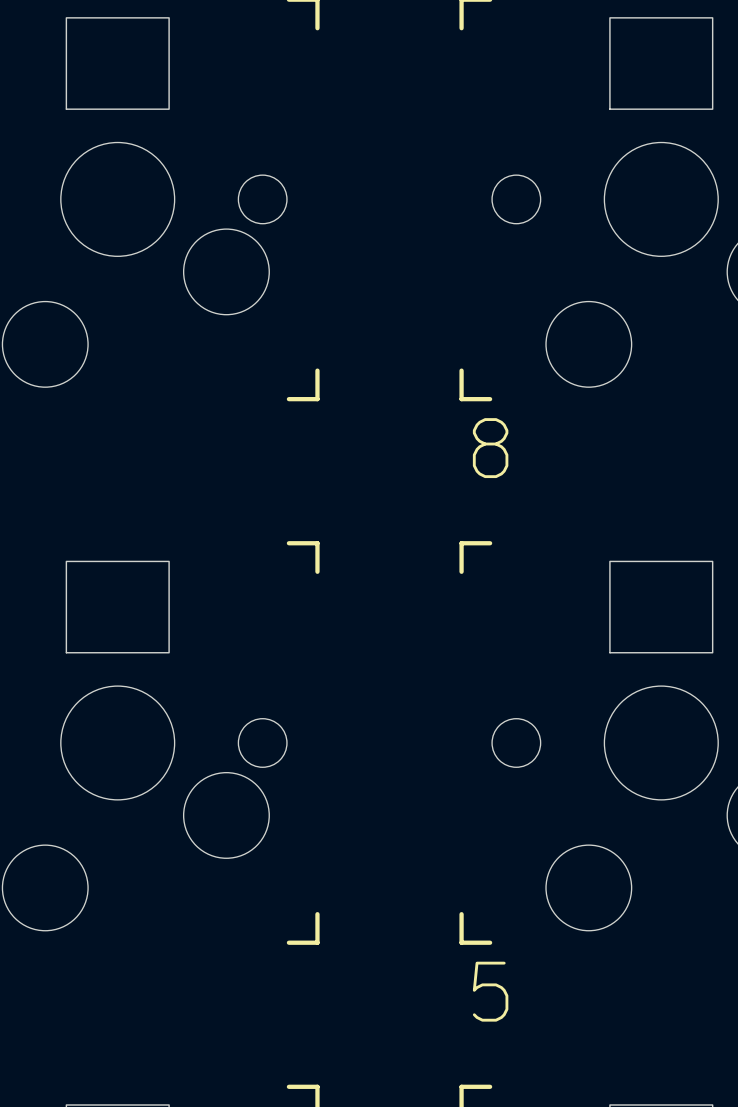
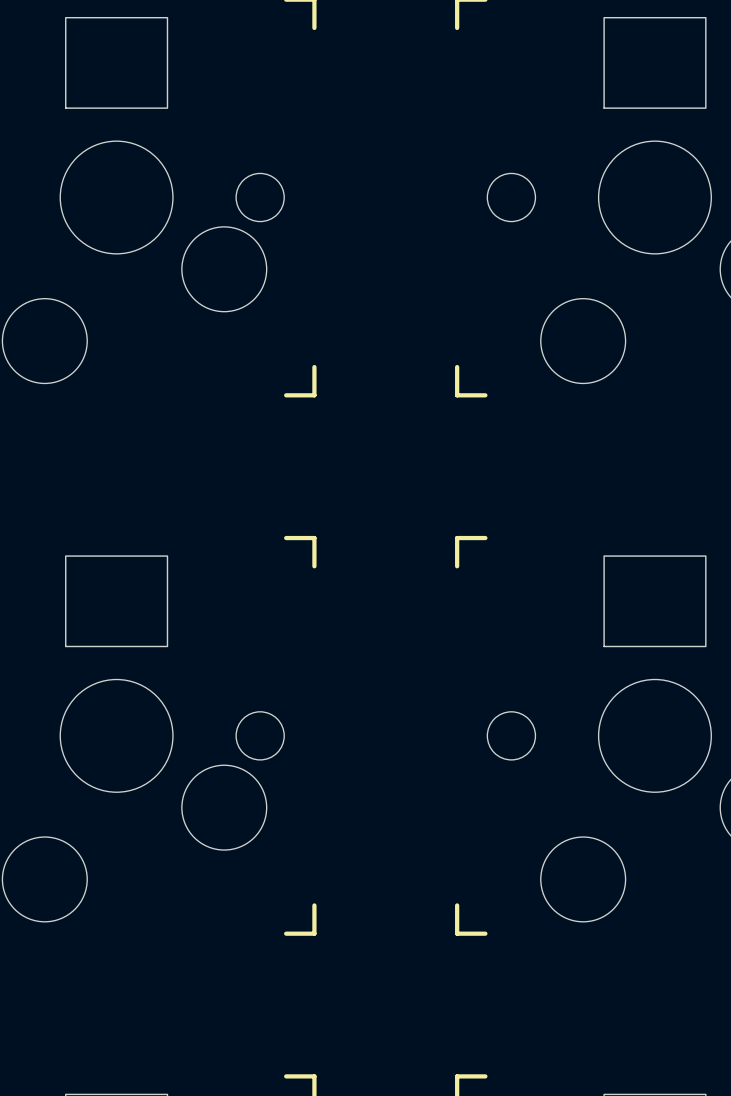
text: 8 (490, 448) -> none
text: 5 (490, 991) -> none

